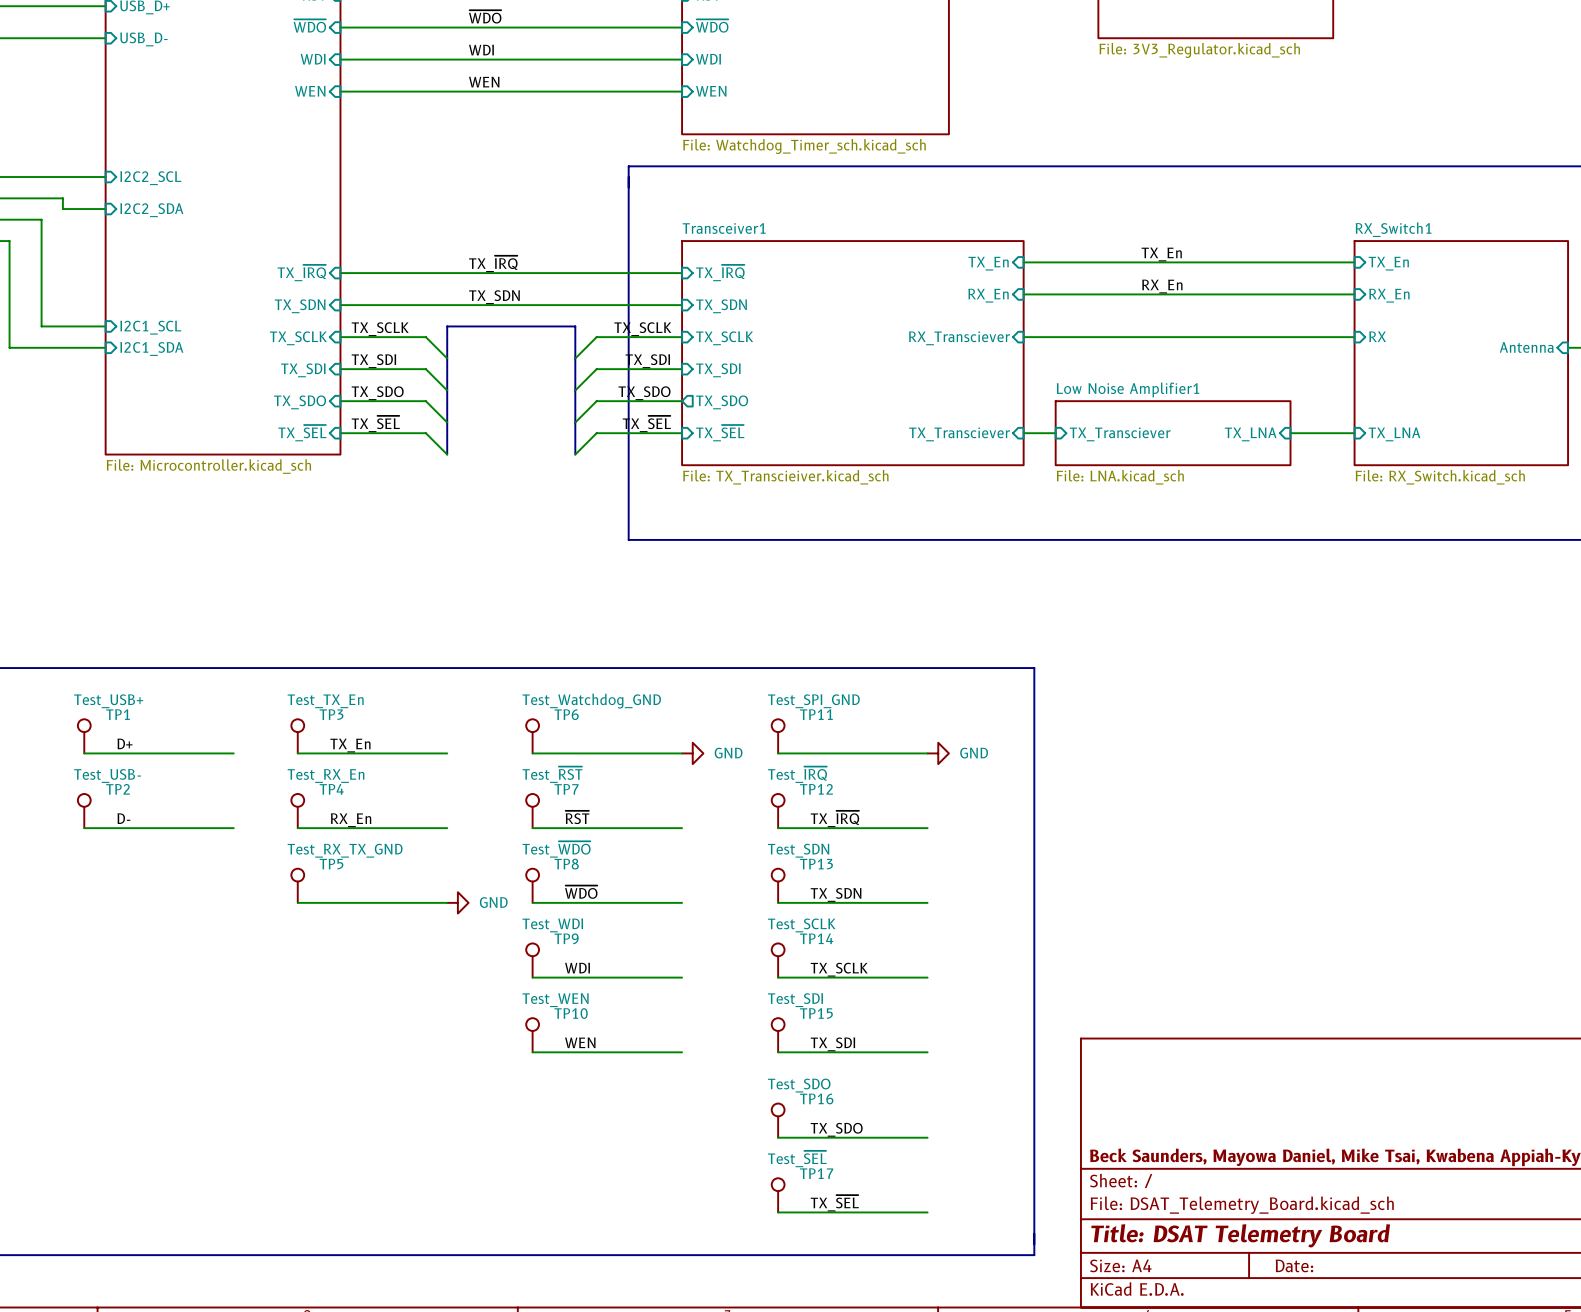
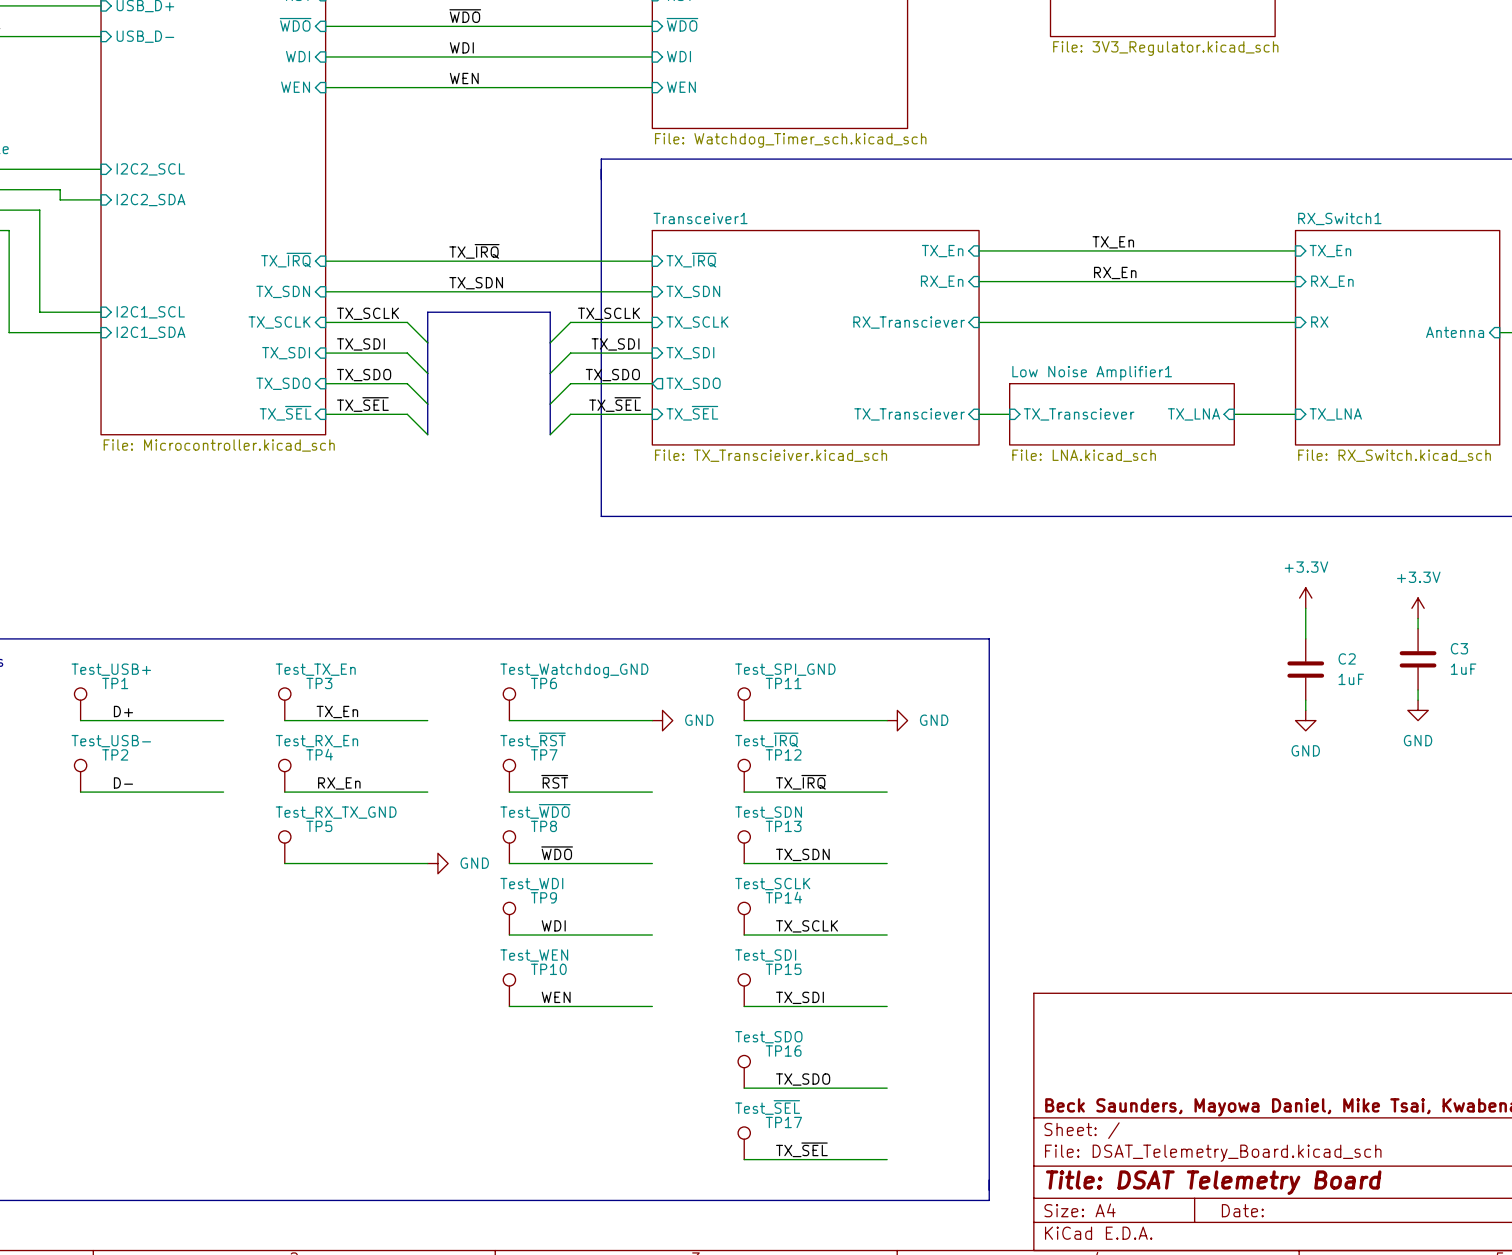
power symbol: none -> +3.3V (1305, 598)
wire: none -> (1305, 608) (1305, 638)
power symbol: none -> +3.3V (1418, 608)
wire: none -> (1418, 618) (1418, 628)
C3: none -> 1uF (1418, 659)
C2: none -> 1uF (1305, 669)
wire: none -> (1418, 689) (1418, 700)
wire: none -> (1305, 700) (1305, 710)
power symbol: none -> GND (1418, 710)
power symbol: none -> GND (1305, 720)

